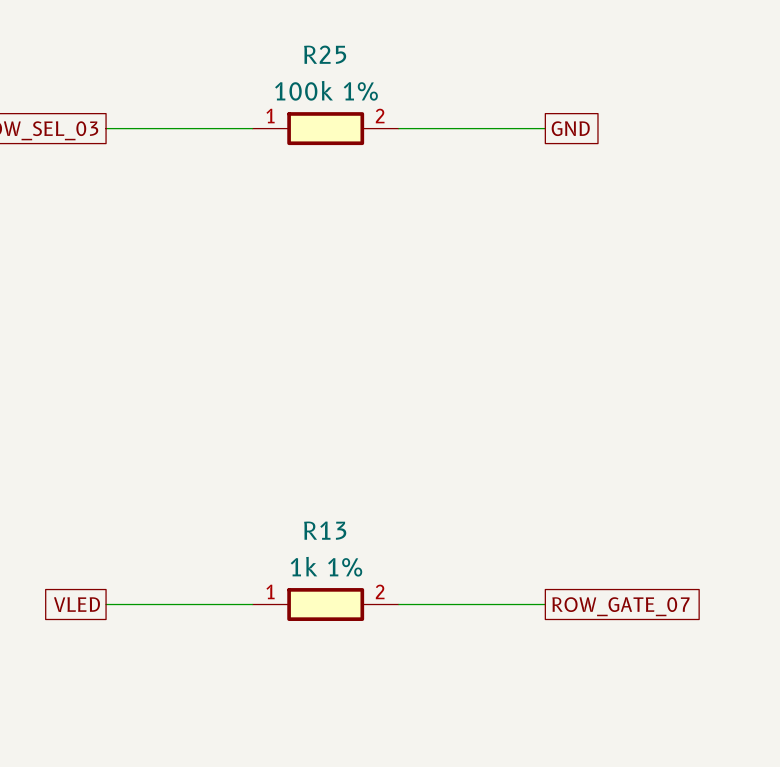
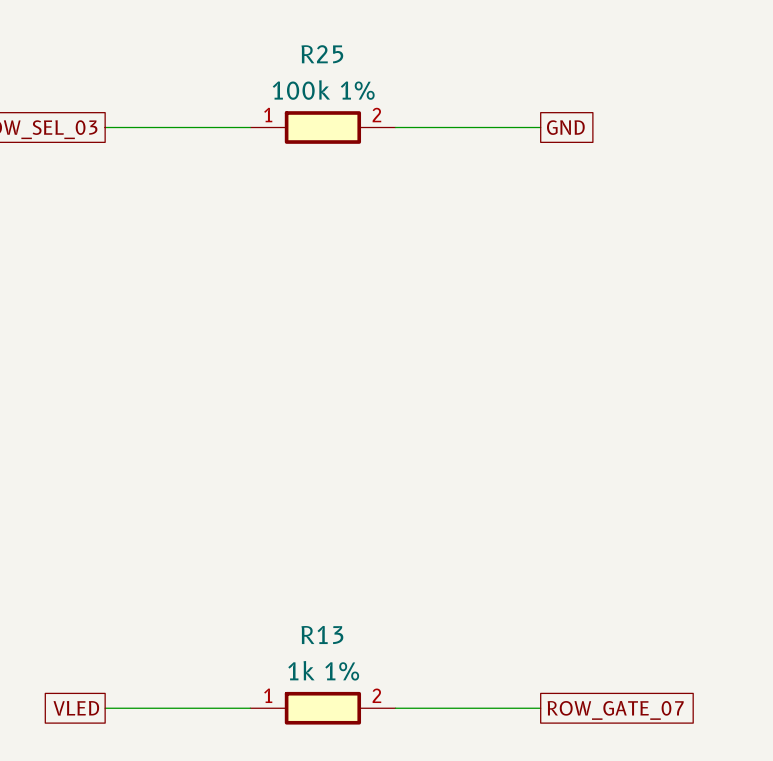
global label position: VLED (76, 604) -> VLED (76, 708)
wire: (106, 604) (252, 604) -> (105, 708) (250, 708)
R13 position: (325, 604) -> (322, 708)
wire: (398, 604) (545, 604) -> (395, 708) (540, 708)
global label position: ROW_GATE_07 (620, 606) -> ROW_GATE_07 (615, 710)

